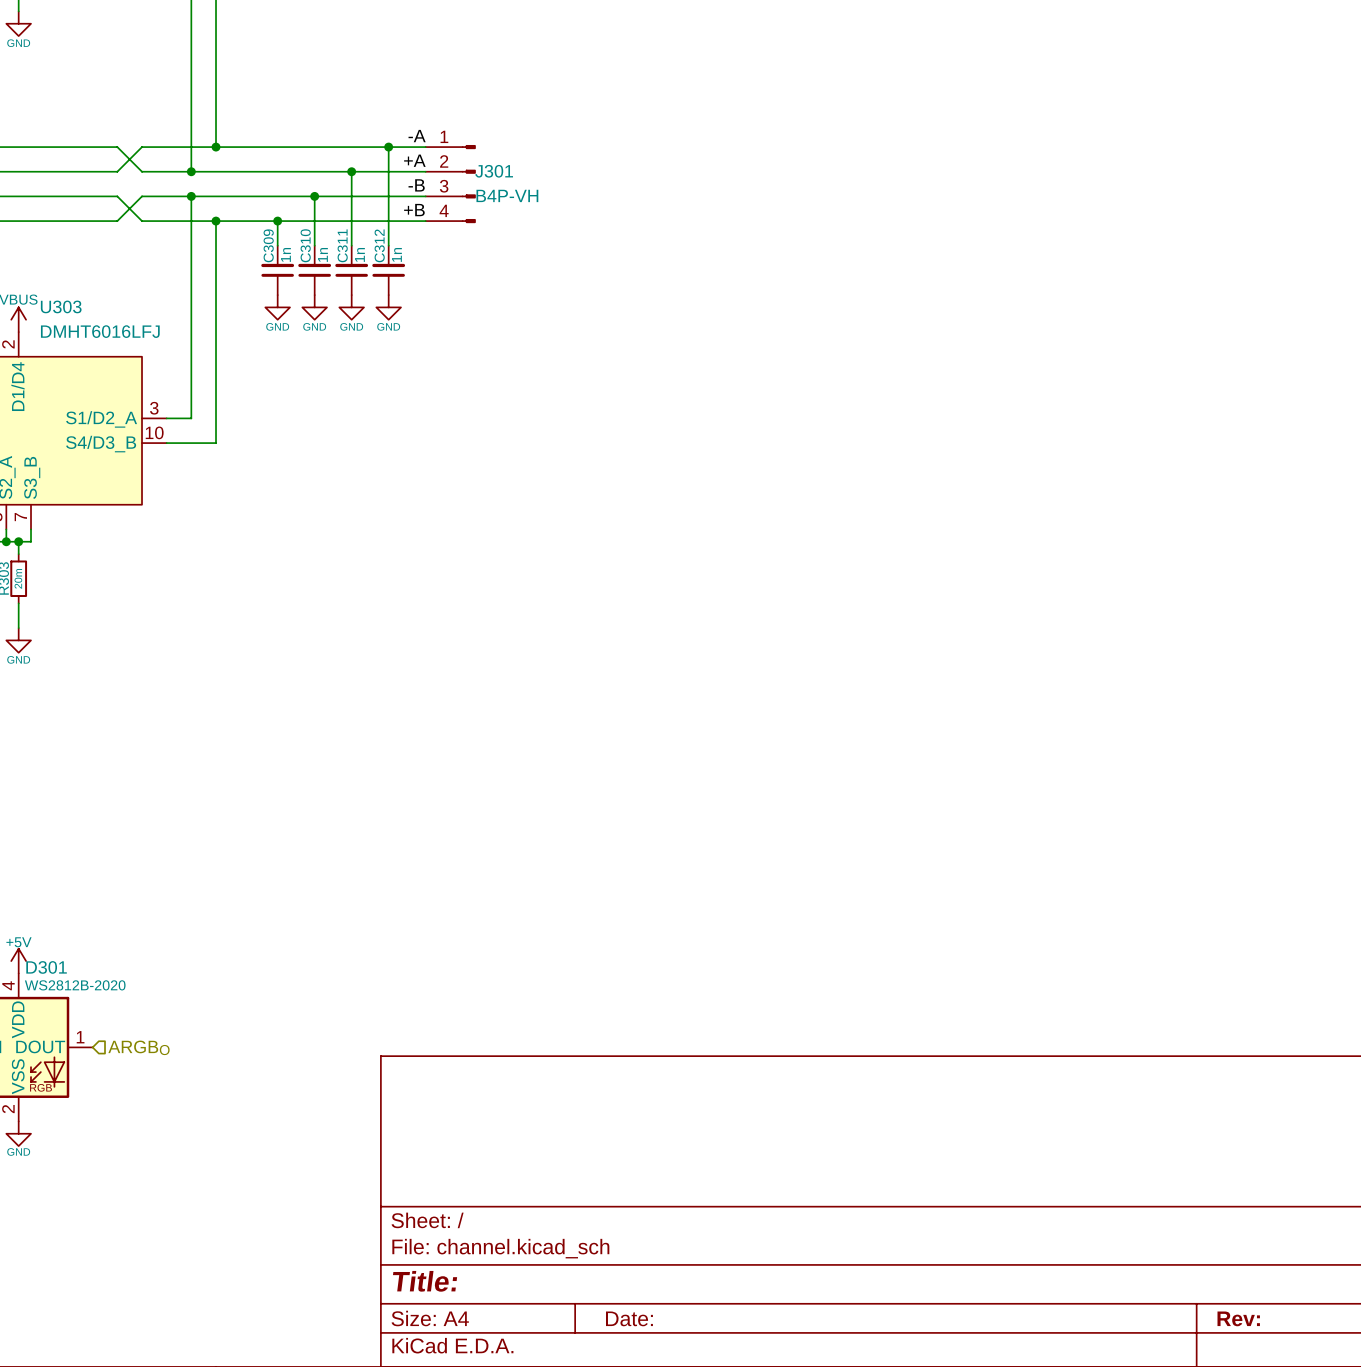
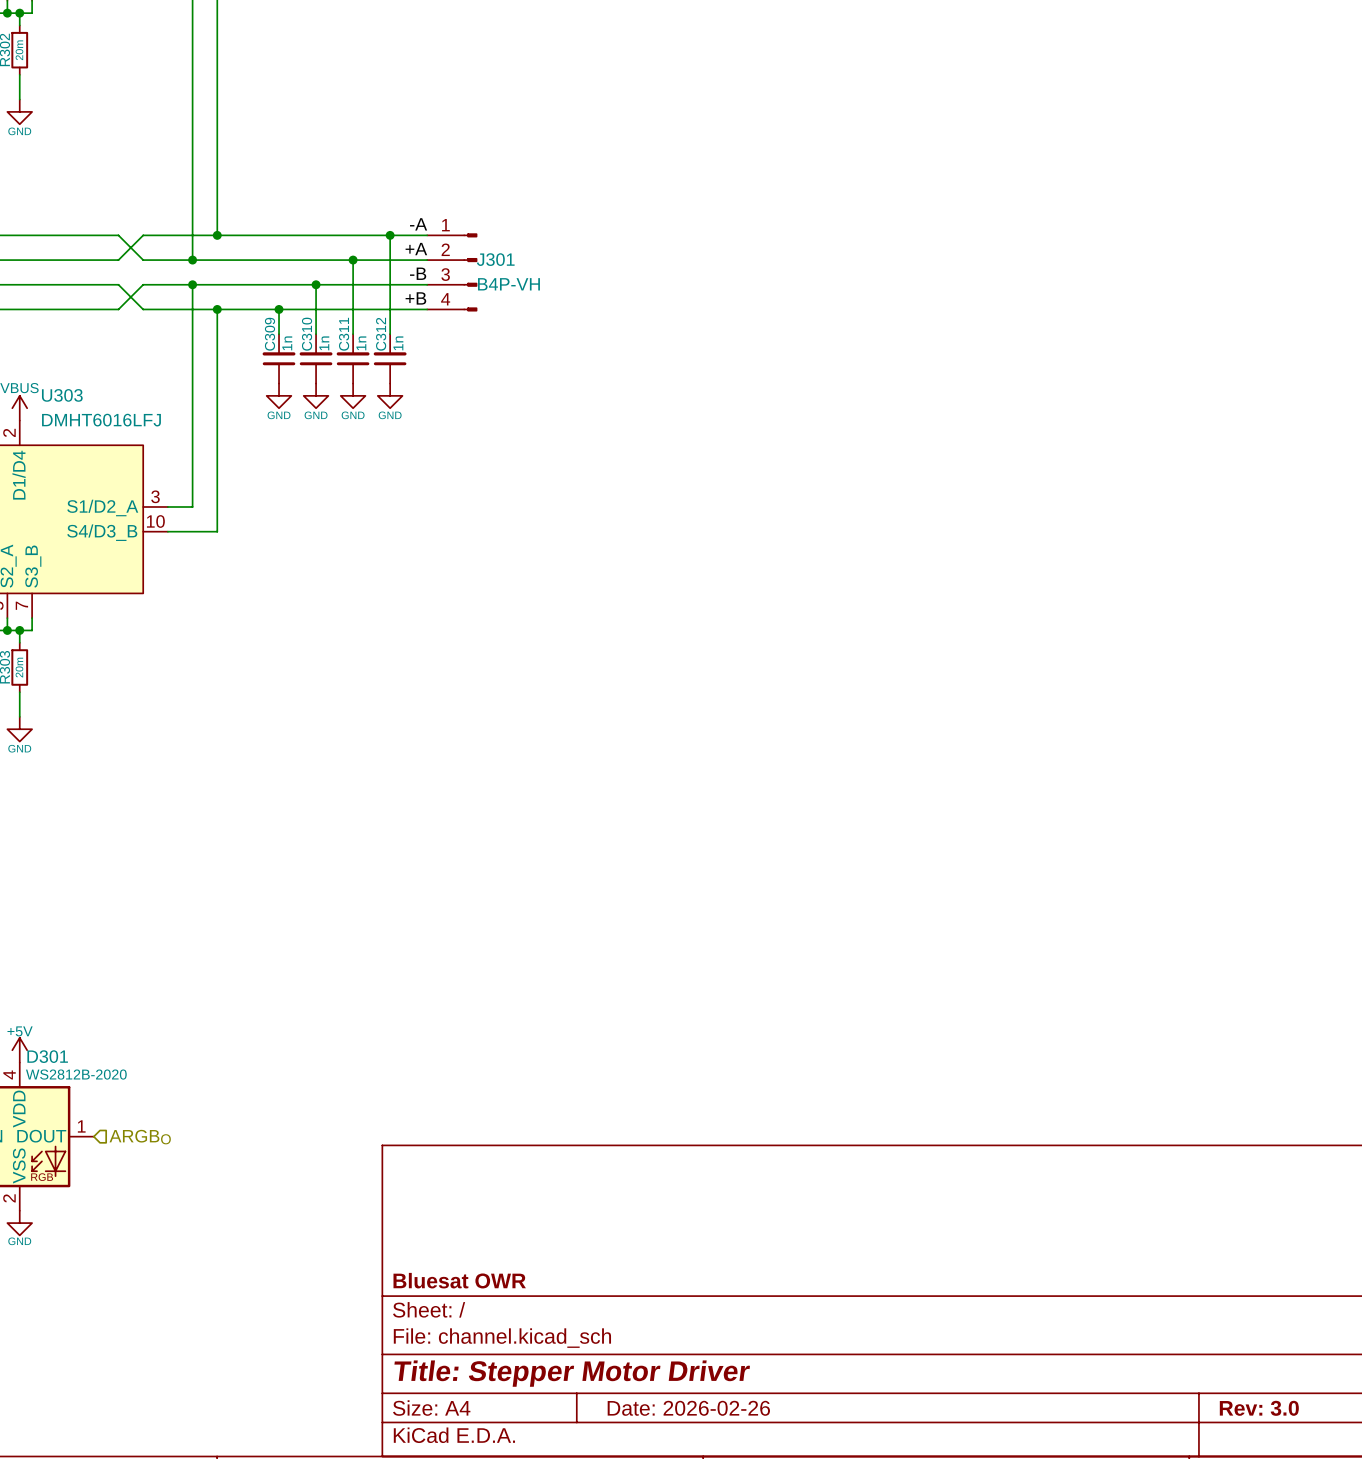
title block: none -> Bluesat OWR (459, 1280)
title block: Title: (425, 1281) -> Title: Stepper Motor Driver (572, 1373)
title block: Date: (629, 1318) -> Date: 2026-02-26 (688, 1408)
title block: Rev: (1238, 1318) -> Rev: 3.0 (1259, 1408)

